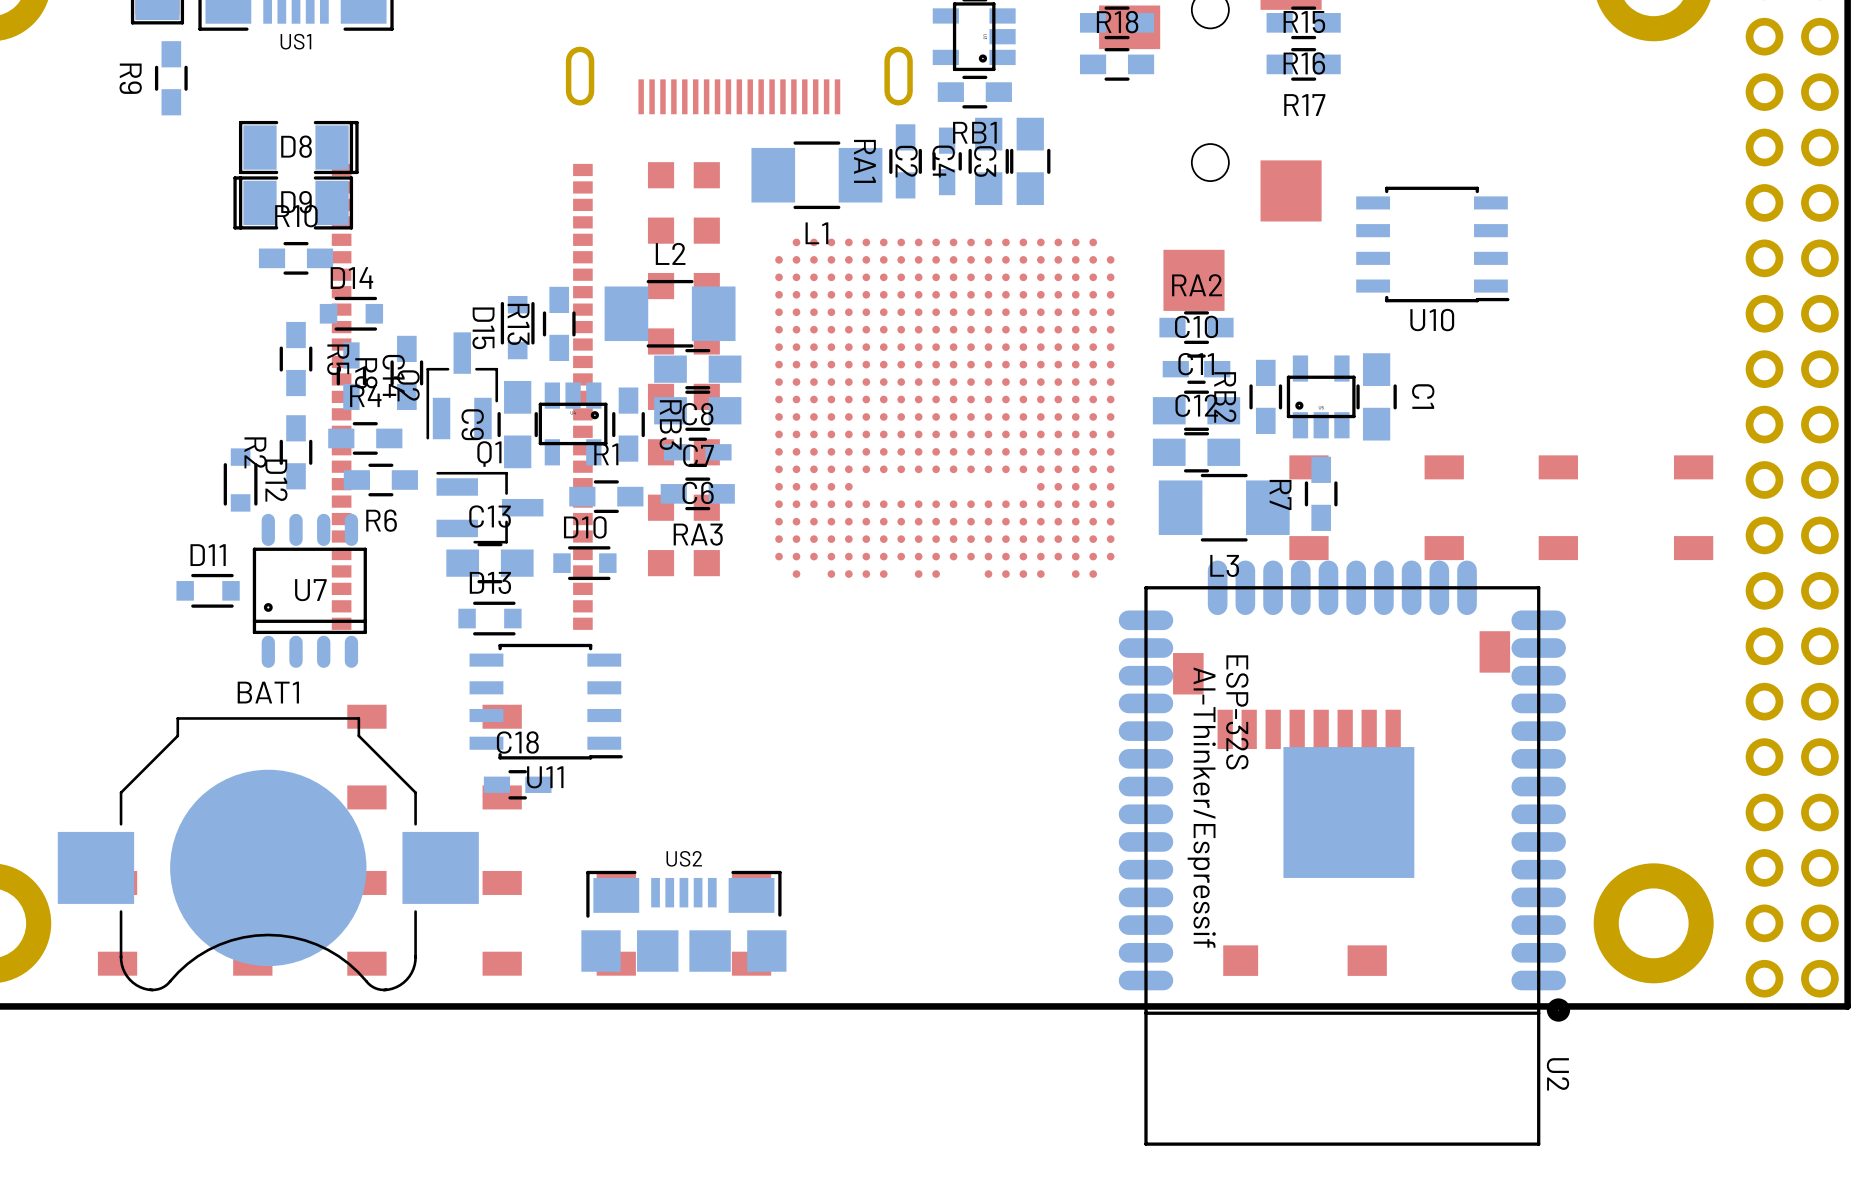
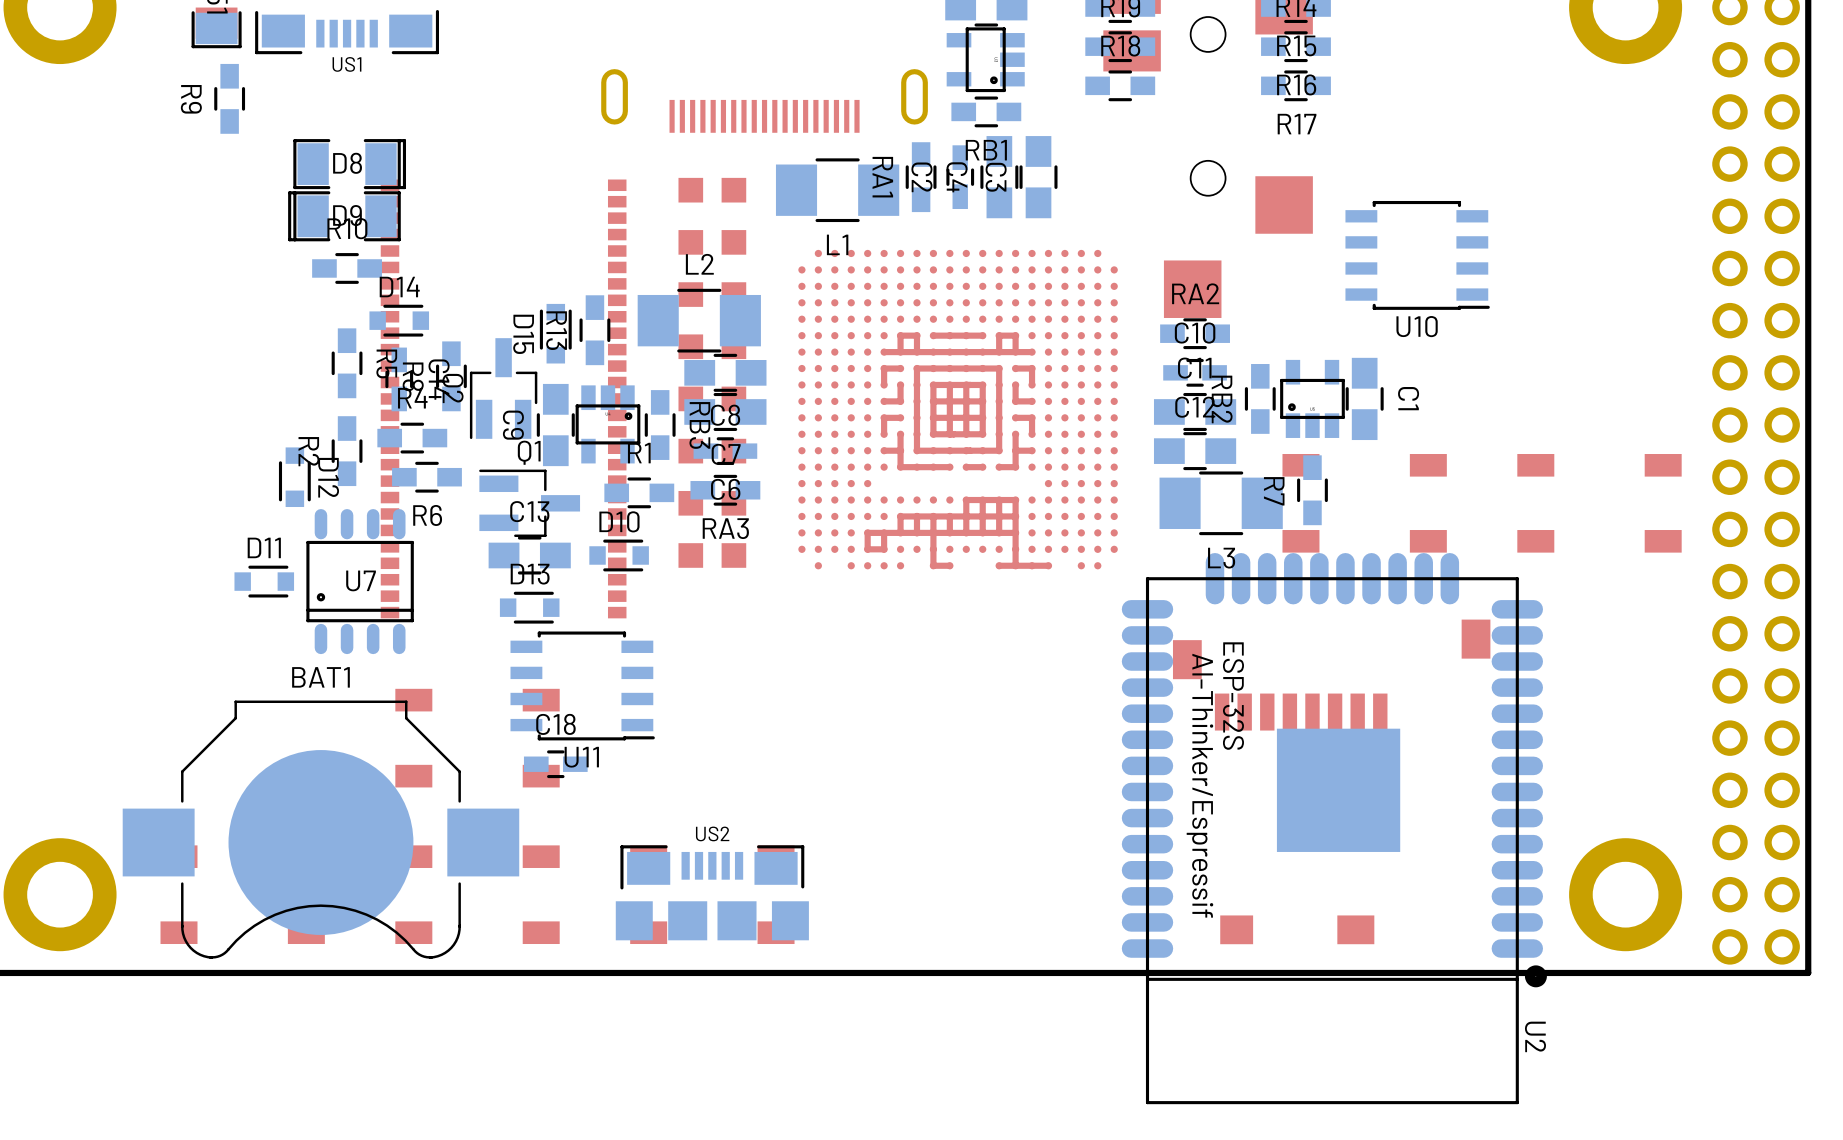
top track: none -> (982, 335) (933, 335)
top track: none -> (916, 352) (916, 335) (900, 335) (900, 352)
top track: none -> (1015, 352) (1015, 335) (999, 335) (999, 352)
top track: none -> (1032, 352) (884, 352)
top track: none -> (900, 368) (884, 368) (884, 384)
top track: none -> (999, 368) (999, 450) (916, 450) (916, 368) (999, 368)
top track: none -> (1015, 368) (1032, 368) (1032, 384)
top track: none -> (900, 384) (900, 401) (884, 401)
top track: none -> (949, 384) (949, 434)
top track: none -> (966, 384) (966, 434)
top track: none -> (982, 384) (982, 434) (933, 434) (933, 384) (982, 384)
top track: none -> (1015, 384) (1015, 401) (1032, 401)
top track: none -> (982, 401) (933, 401)
top track: none -> (900, 417) (884, 417) (884, 434)
top track: none -> (982, 417) (933, 417)
top track: none -> (1015, 417) (1032, 417) (1032, 434)
top track: none -> (900, 434) (900, 467) (949, 467)
top track: none -> (1015, 434) (1015, 467) (999, 467)
top track: none -> (900, 450) (884, 450)
top track: none -> (1032, 450) (1015, 450)
top track: none -> (982, 467) (966, 467)
top track: none -> (982, 500) (982, 532)
top track: none -> (999, 500) (999, 532)
top track: none -> (916, 516) (916, 532)
top track: none -> (933, 516) (933, 565) (949, 565)
top track: none -> (949, 516) (949, 532)
top track: none -> (1015, 516) (900, 516) (900, 532)
top track: none -> (966, 532) (966, 500) (1015, 500) (1015, 565)
top track: none -> (1015, 532) (867, 532) (867, 549) (884, 549) (884, 532)
top track: none -> (1048, 565) (999, 565)

